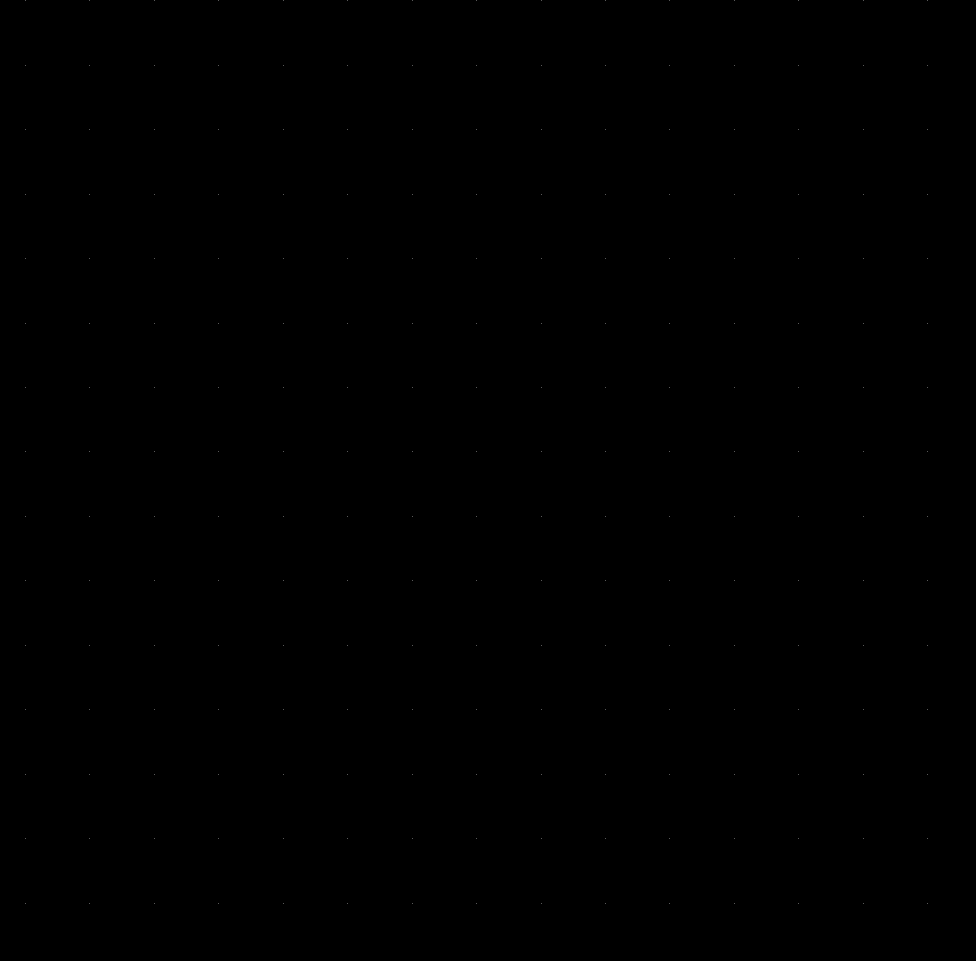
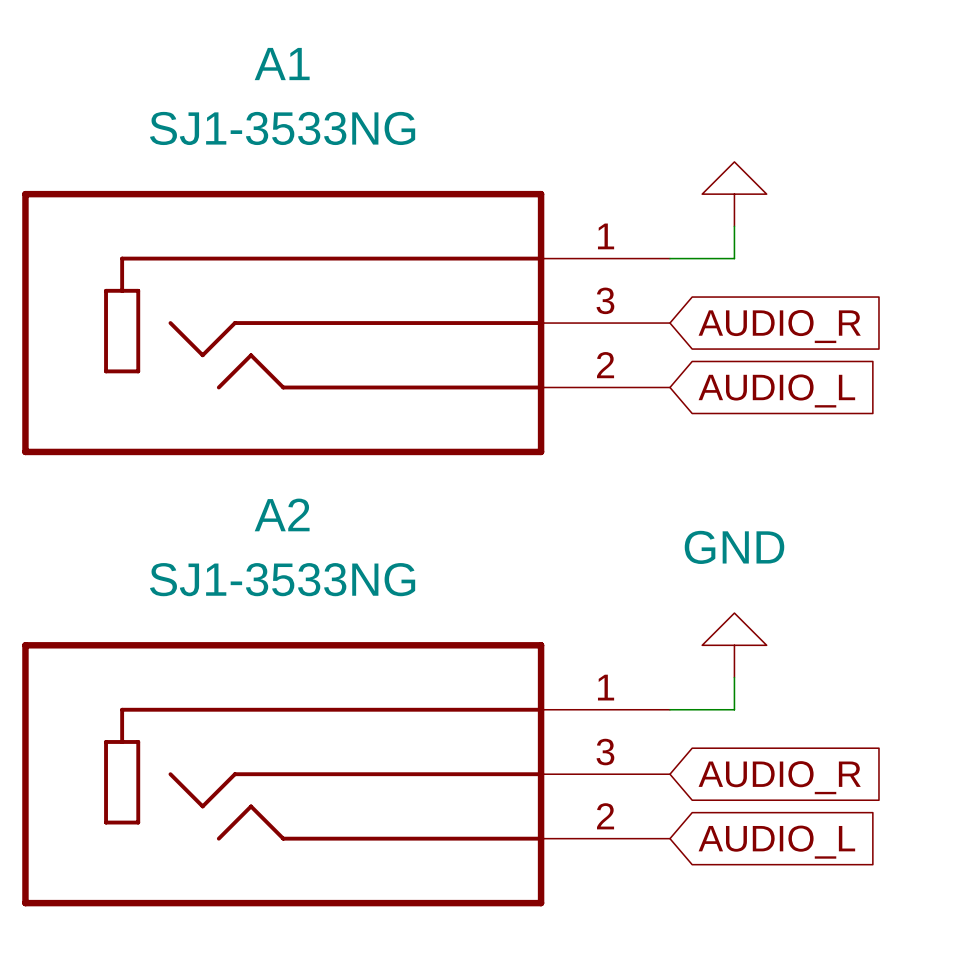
power symbol: none -> (734, 194)
wire: none -> (734, 226) (734, 258) (669, 258)
A1: none -> SJ1-3533NG (346, 323)
global label: none -> AUDIO_R (779, 326)
global label: none -> AUDIO_L (776, 390)
power symbol: none -> GND (734, 645)
wire: none -> (734, 677) (734, 709) (669, 709)
A2: none -> SJ1-3533NG (346, 774)
global label: none -> AUDIO_R (779, 777)
global label: none -> AUDIO_L (776, 842)

